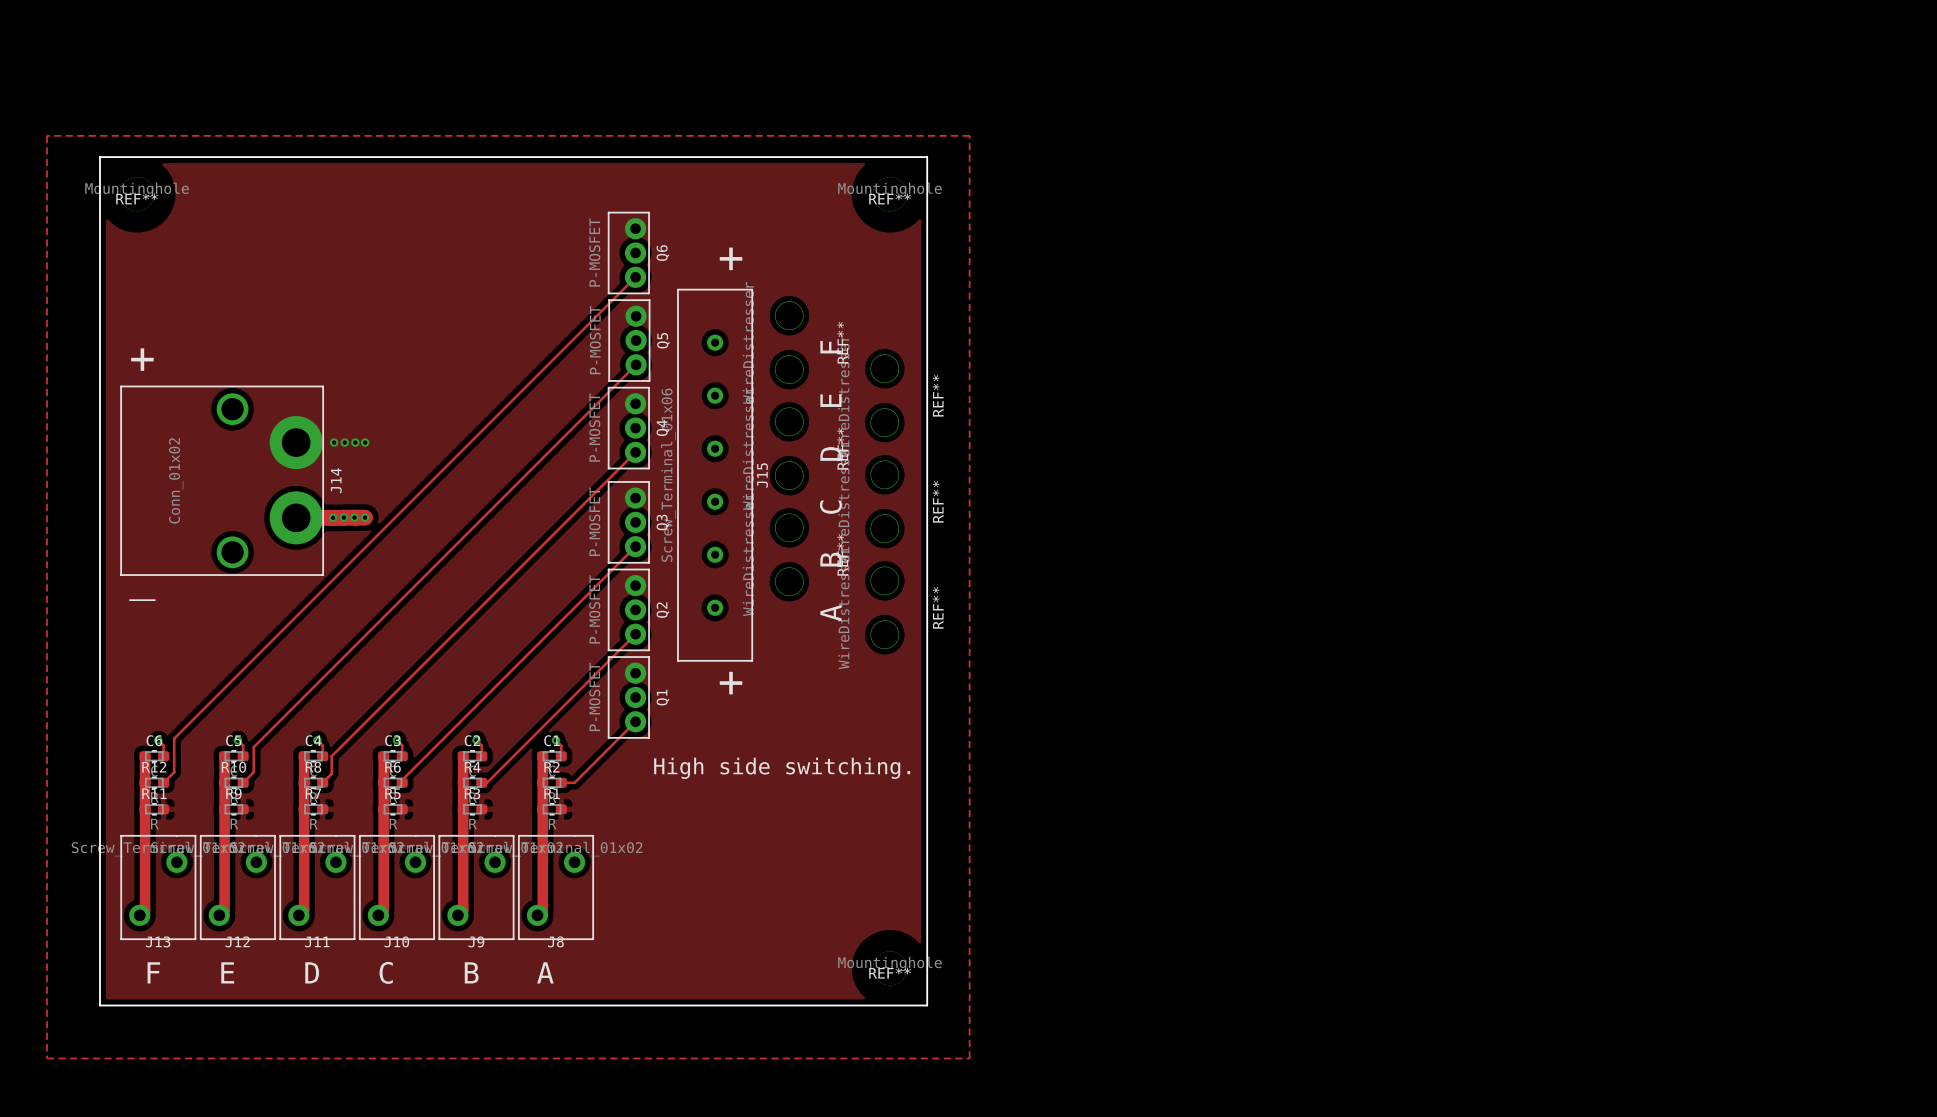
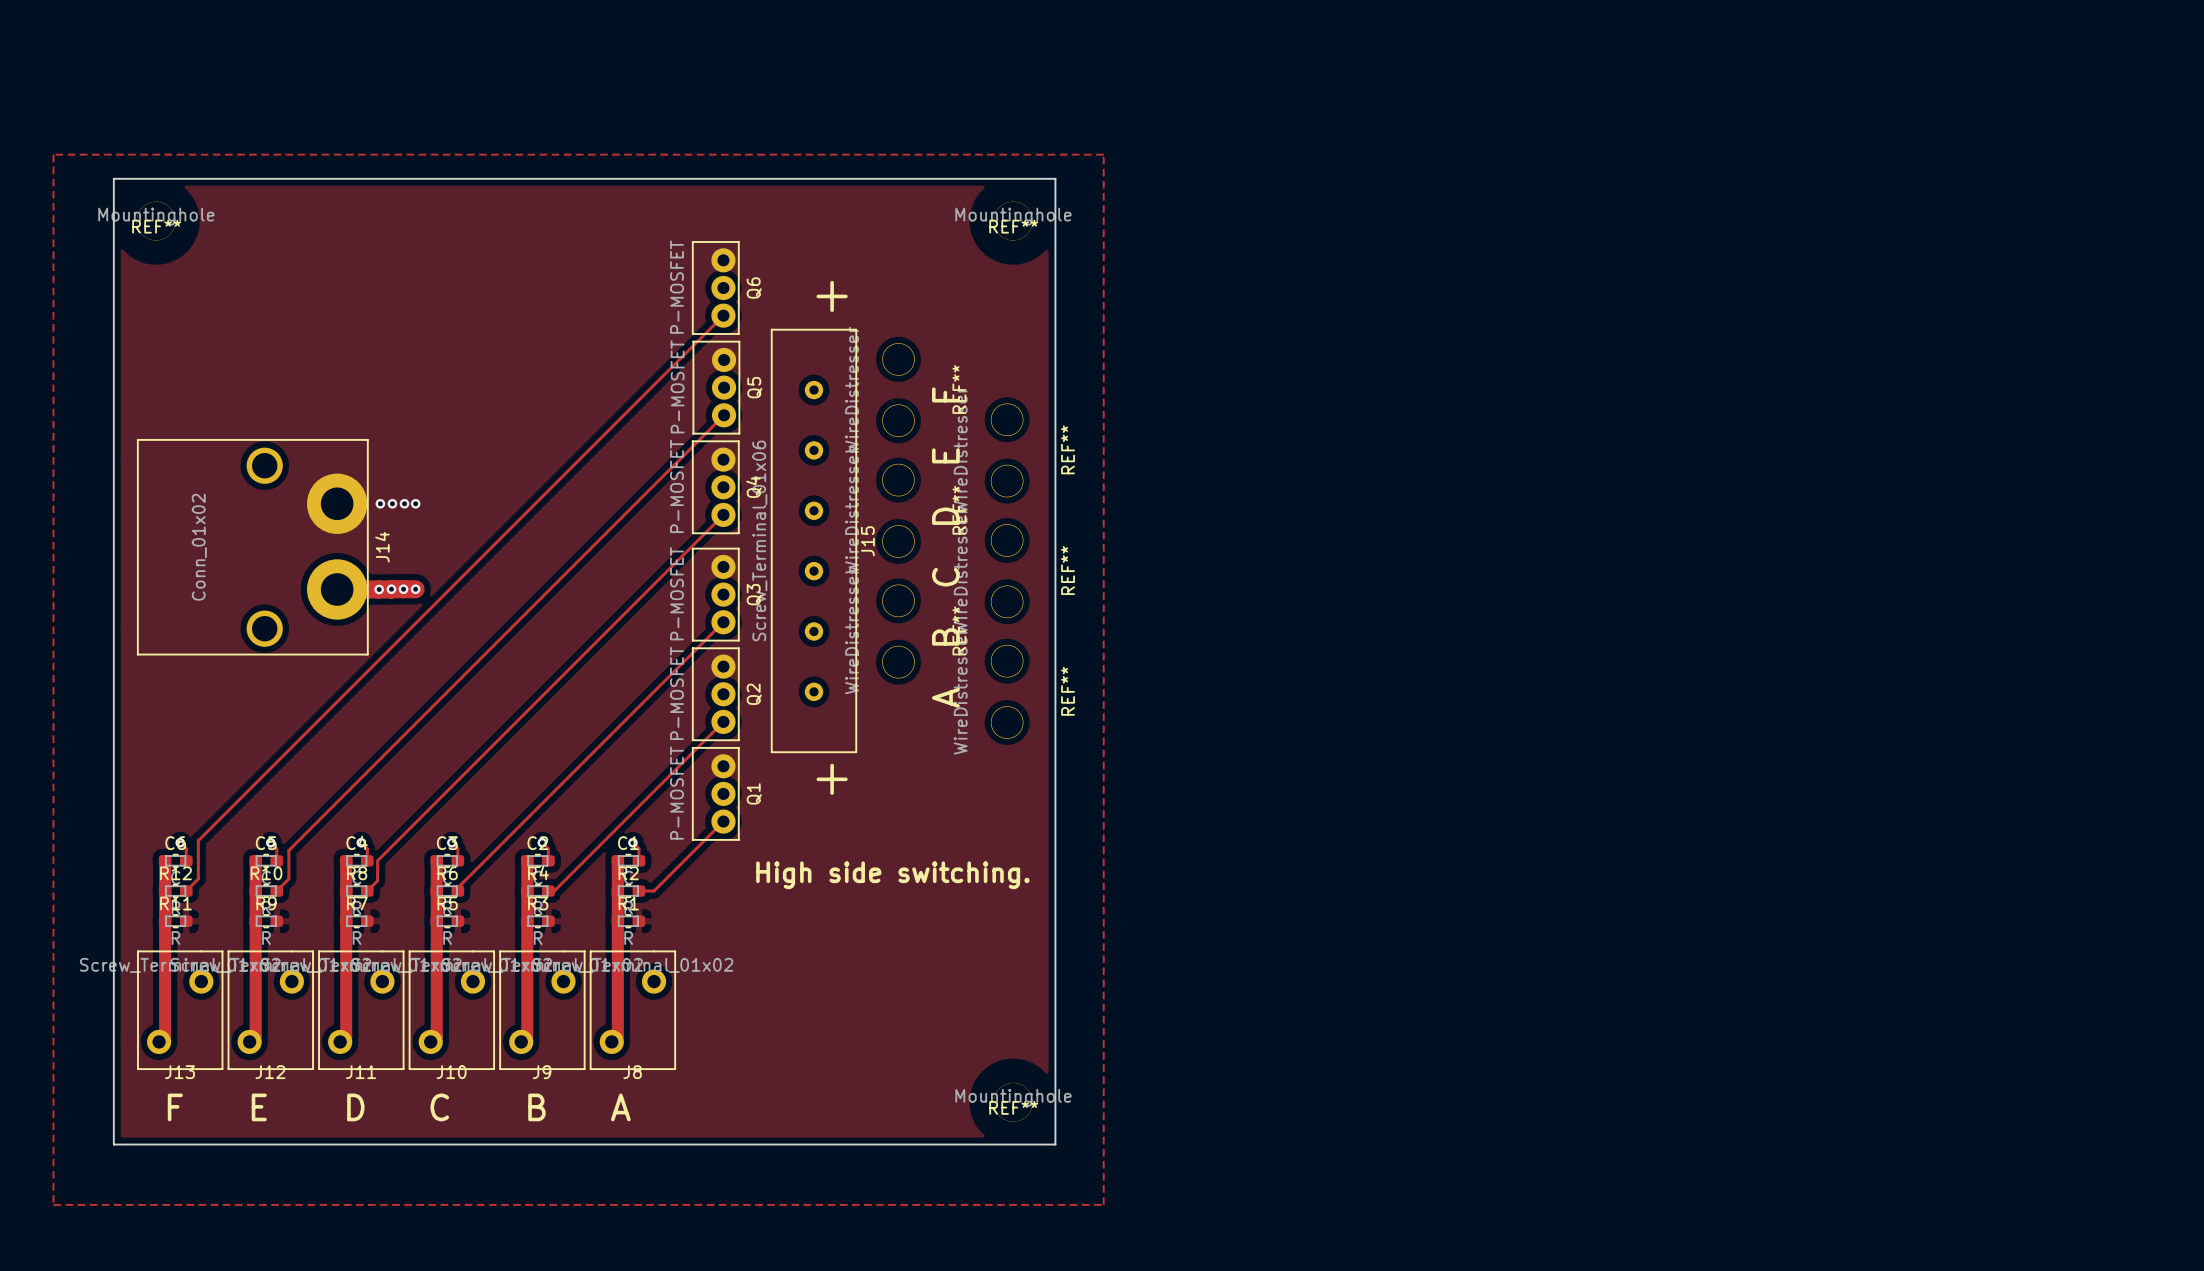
text: + (142, 359) -> none
text: _ (142, 600) -> none

